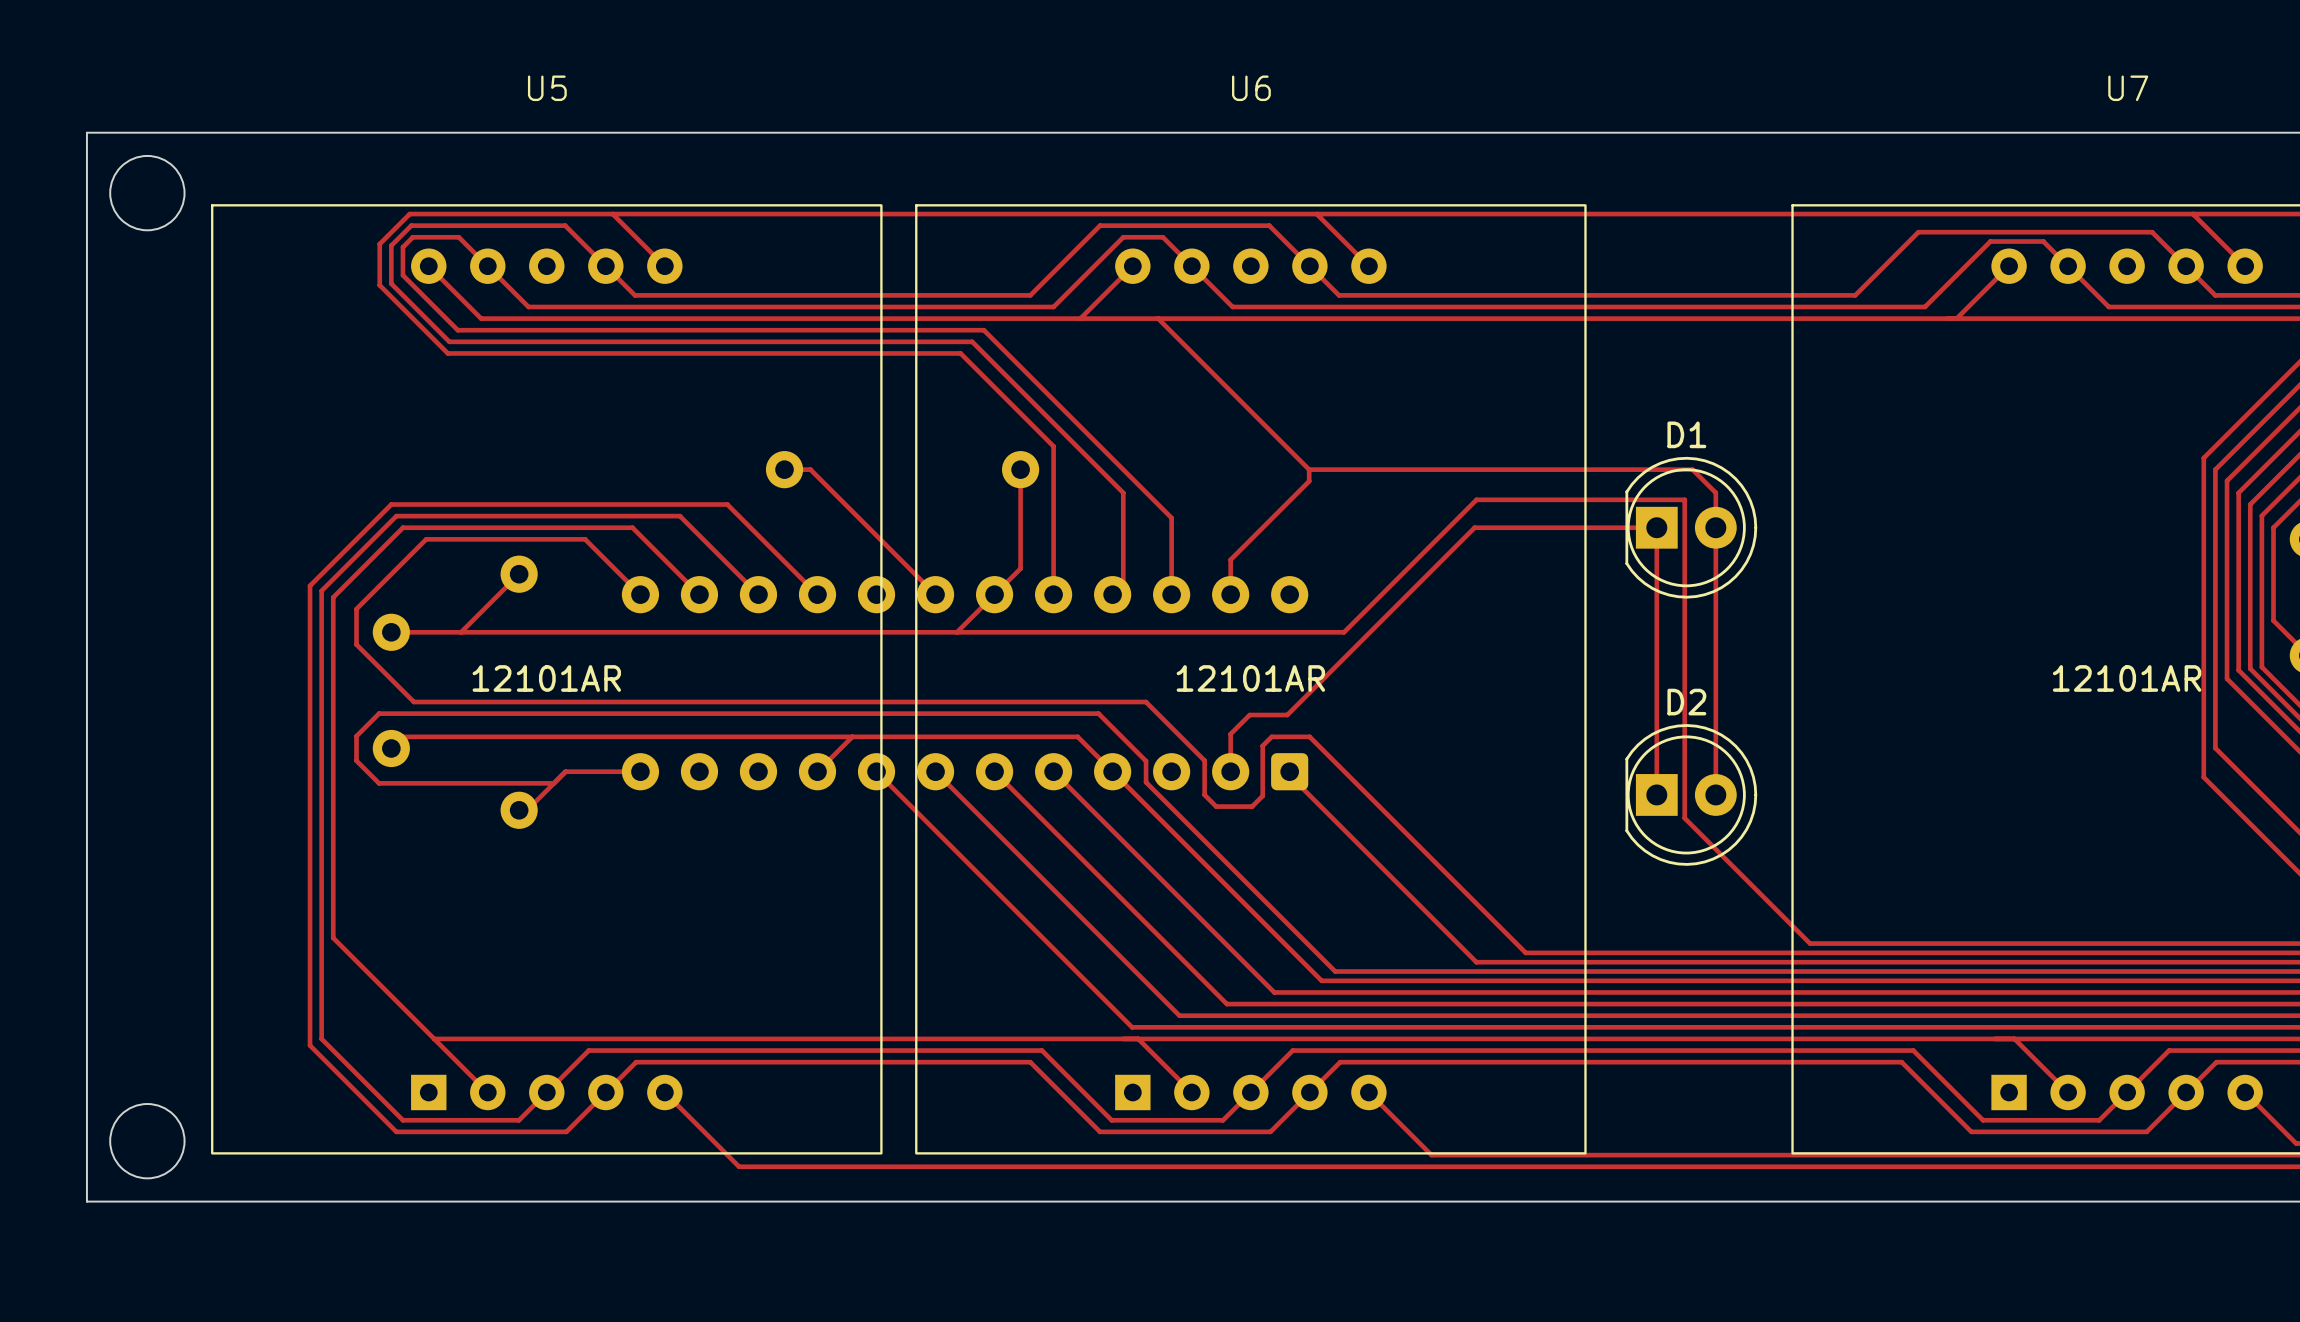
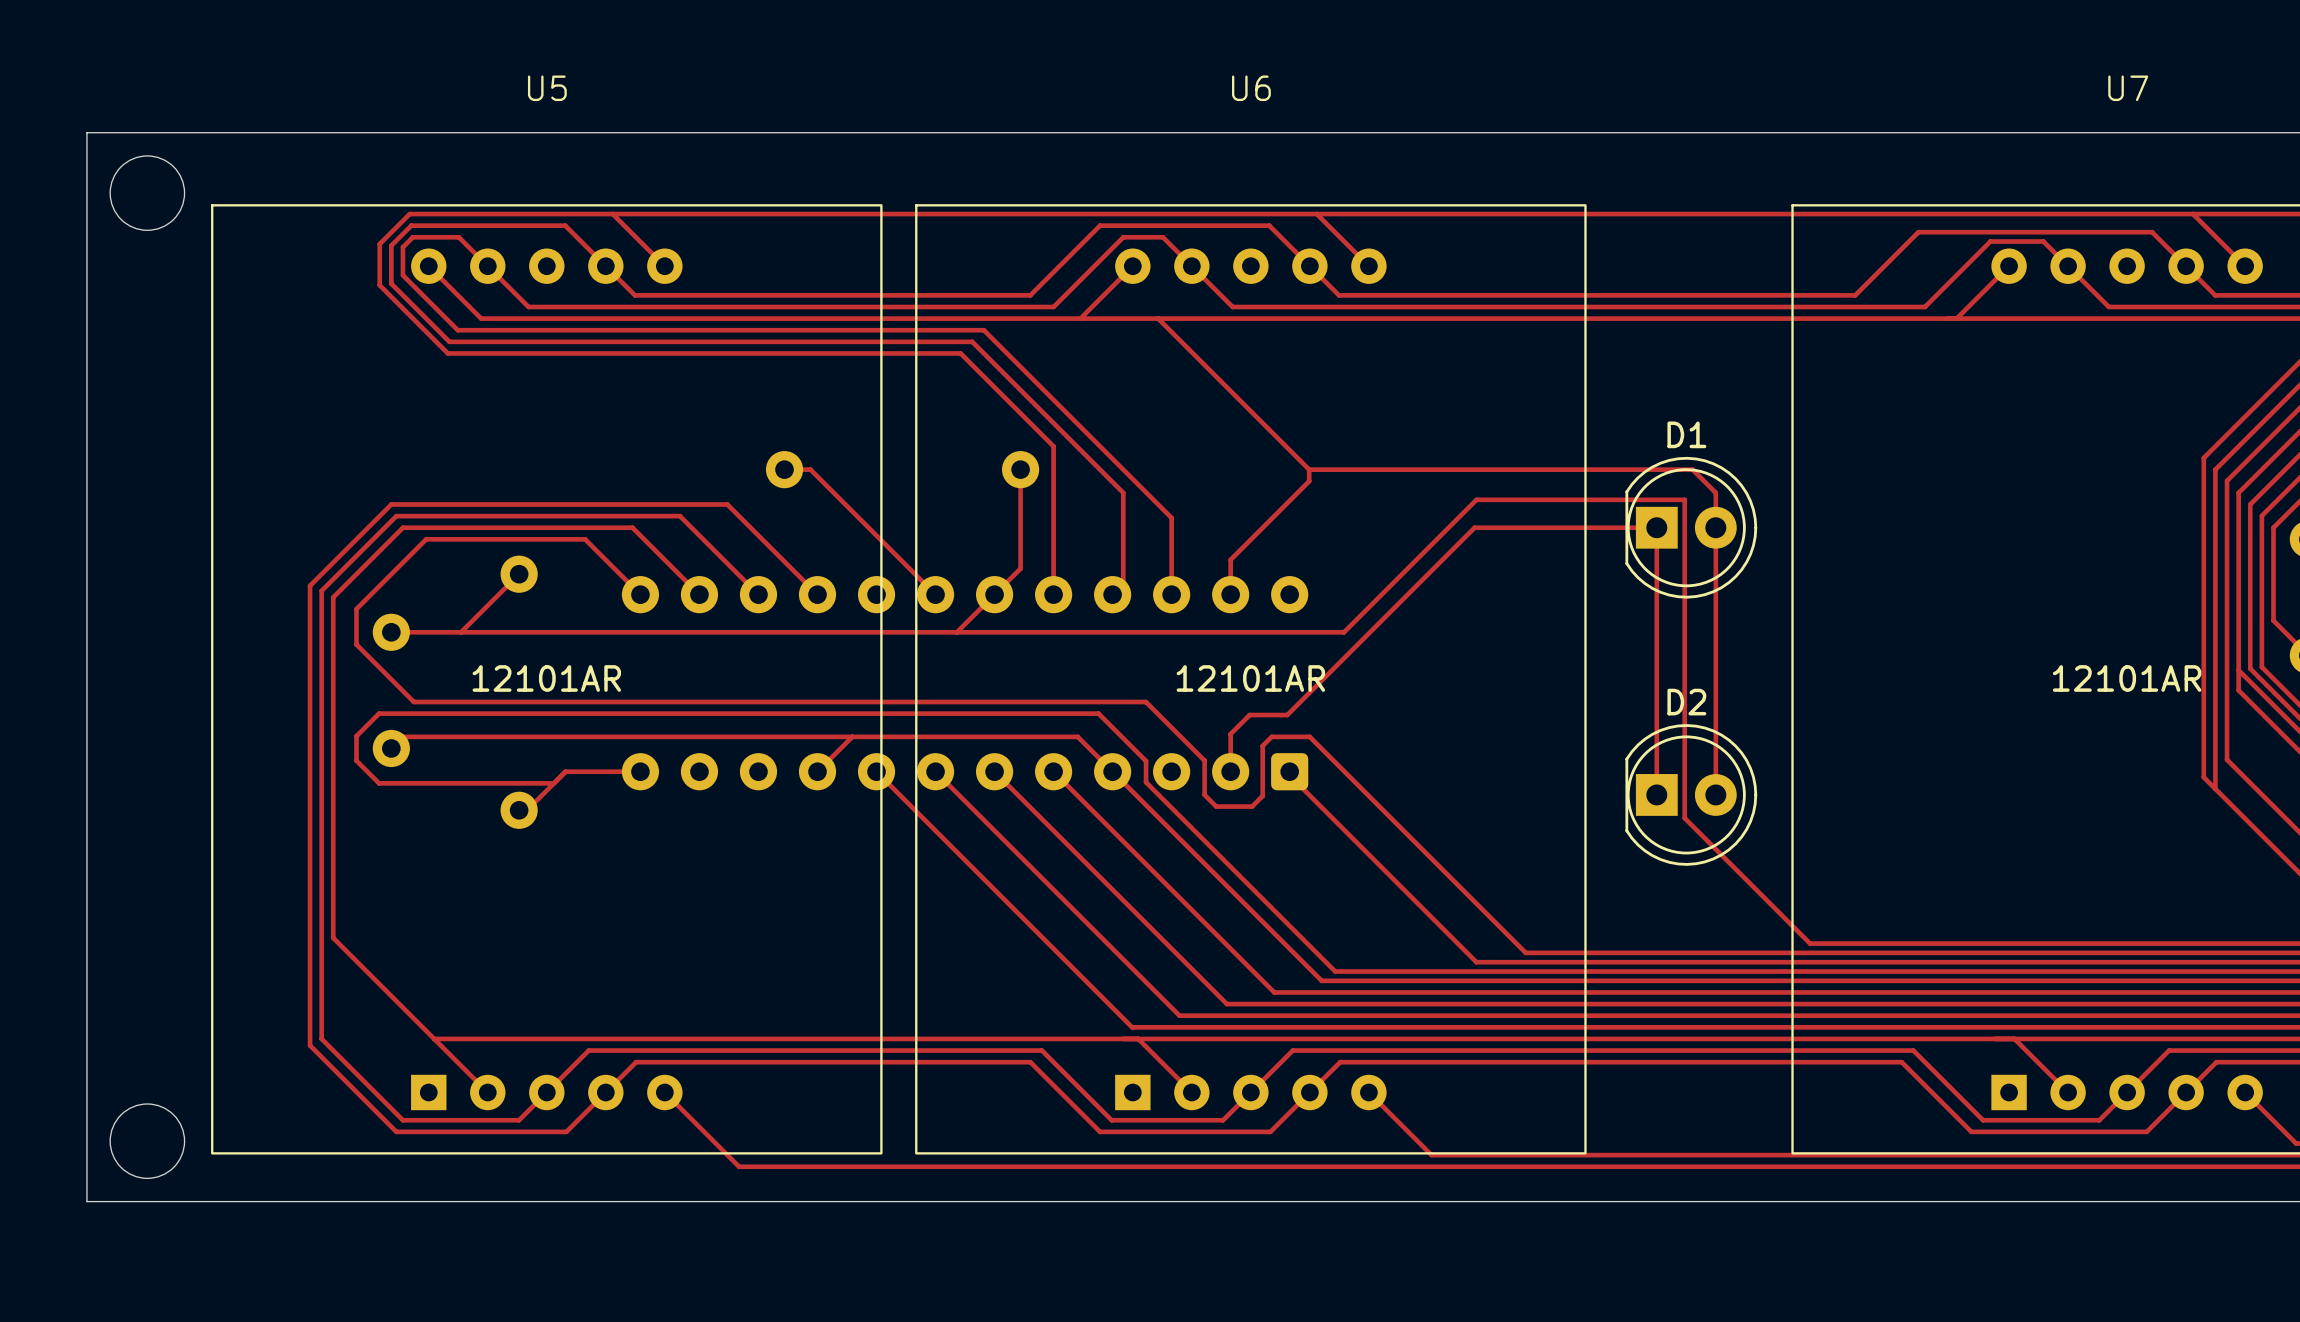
top track: (2227, 678) (2238, 690) -> (2238, 670) (2238, 690)
top track: none -> (2227, 678) (2227, 759)
top track: (2215, 748) (2227, 759) -> (2215, 748) (2215, 788)

